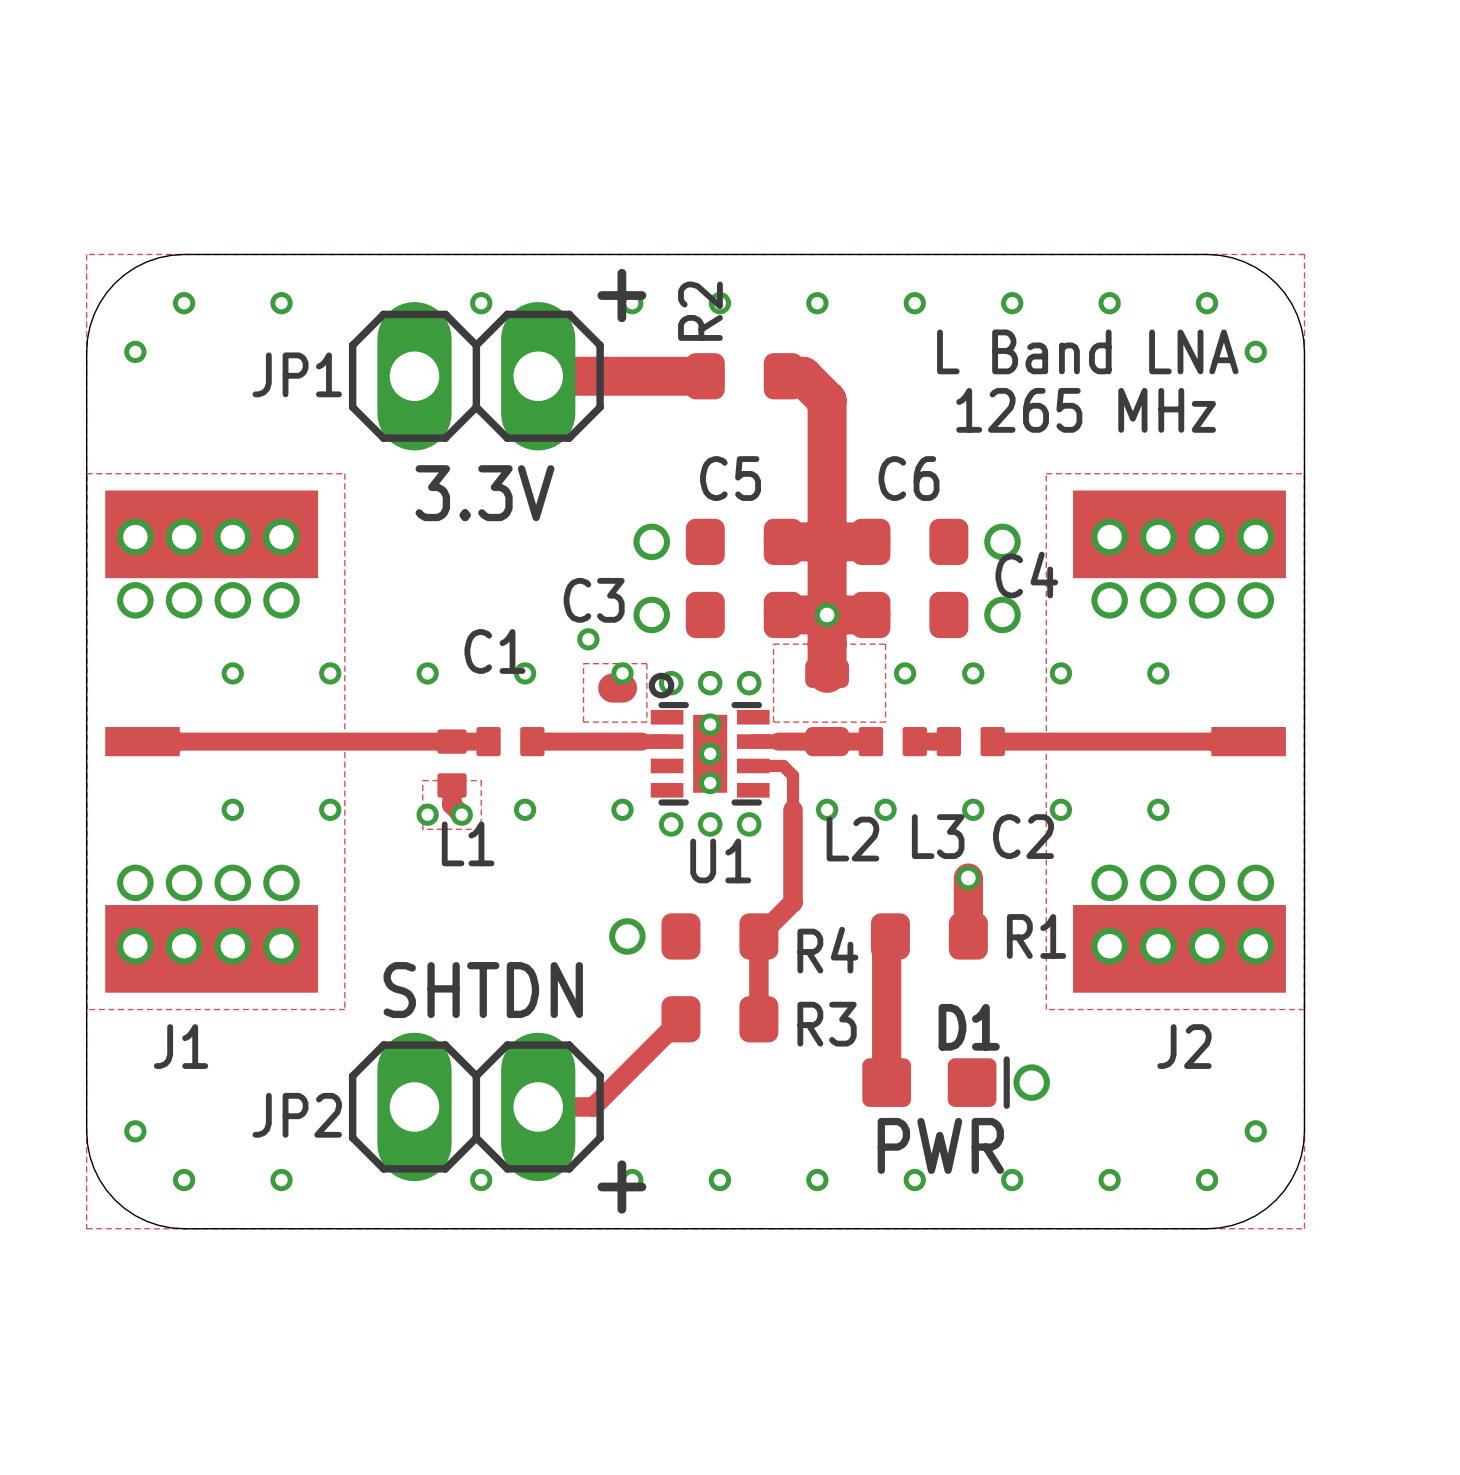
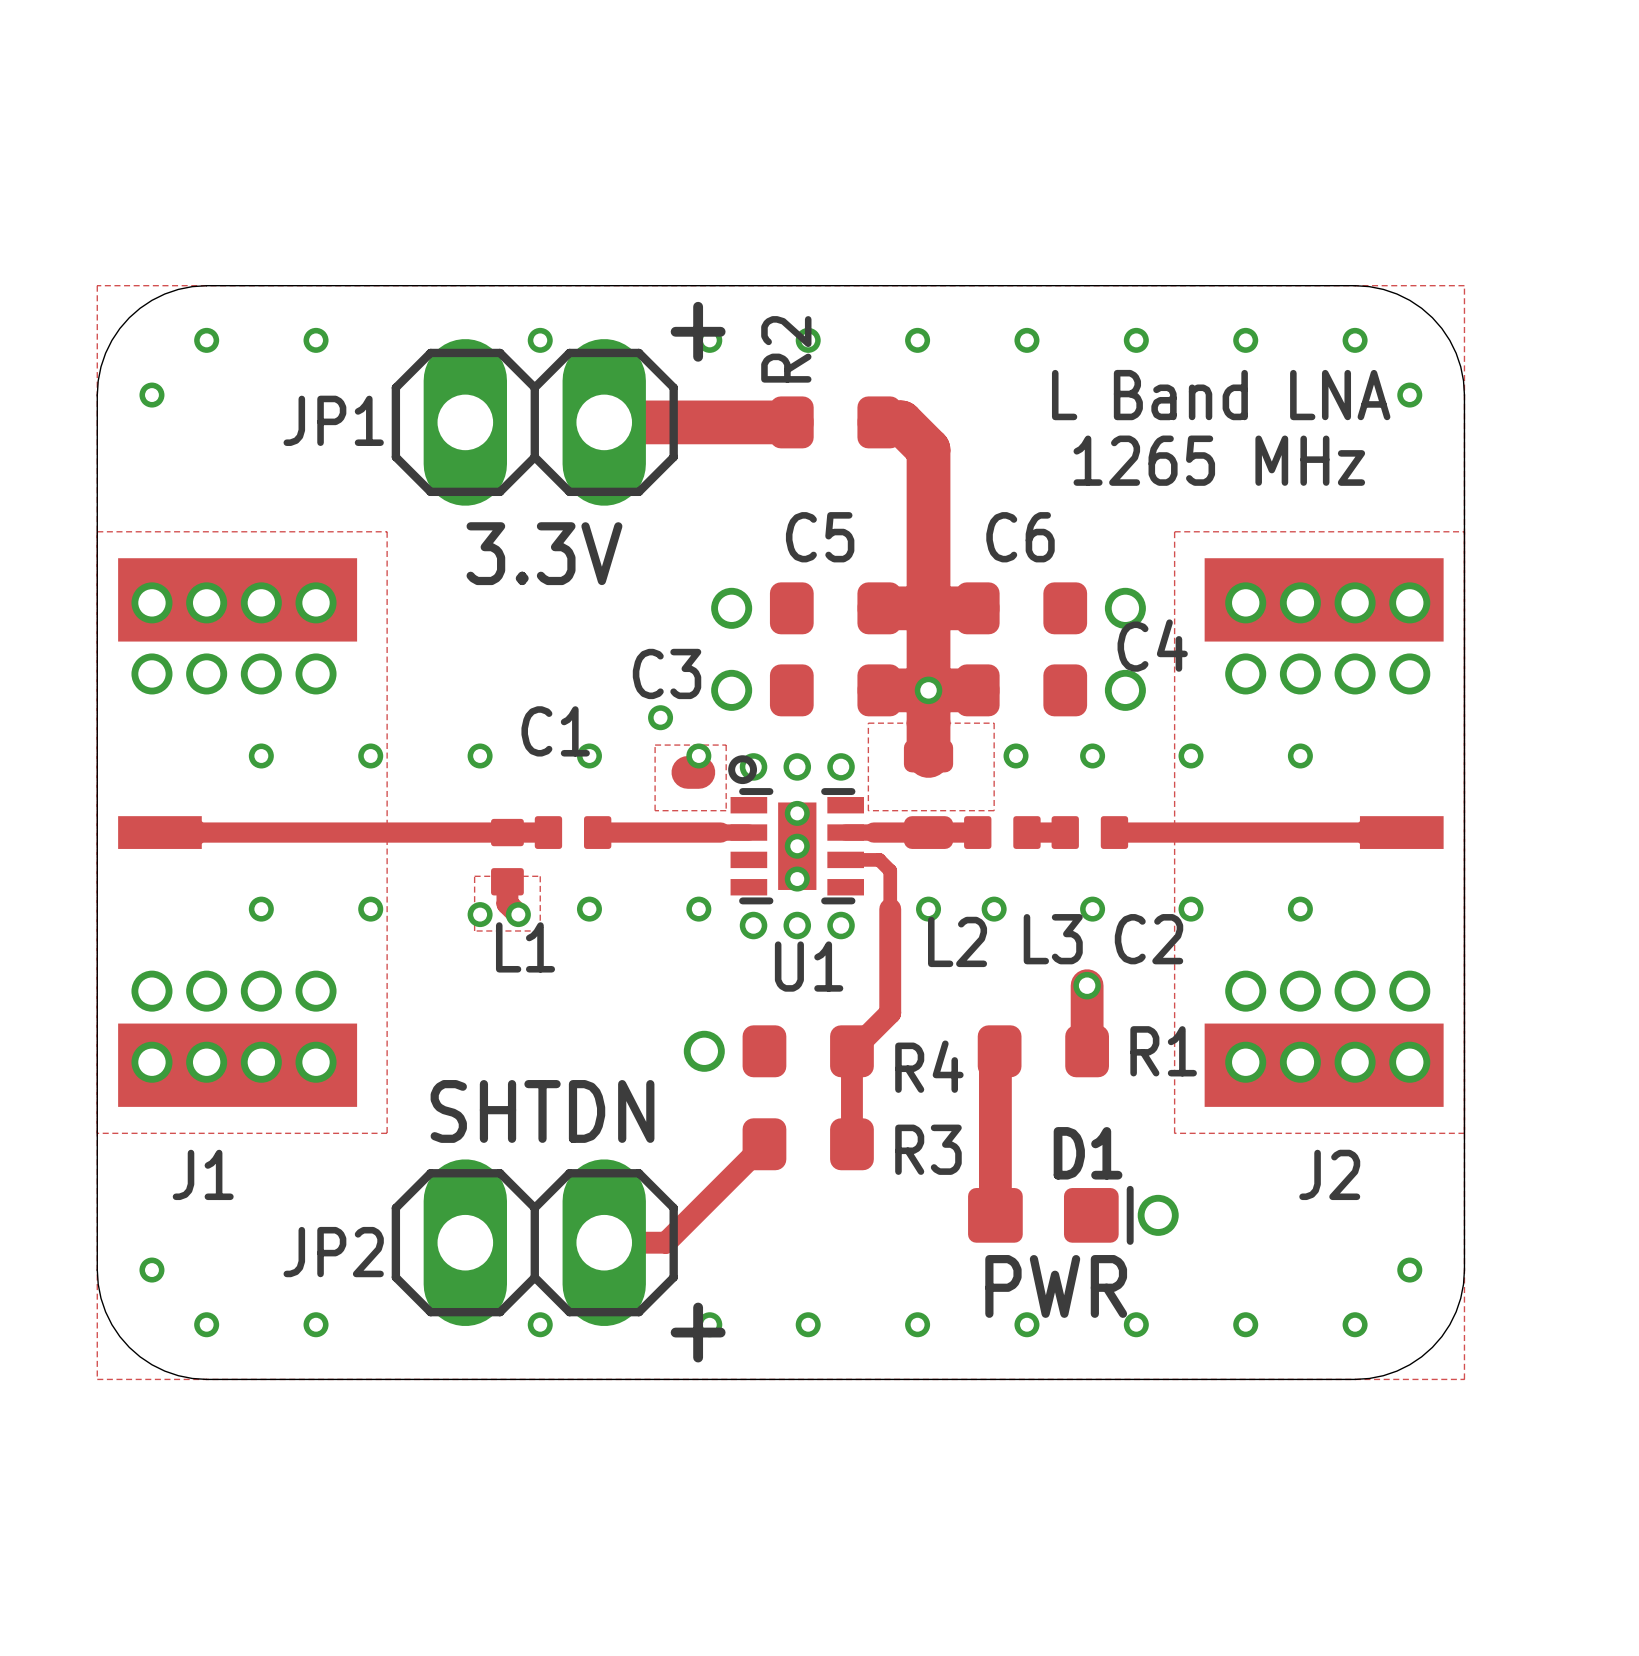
J1 footprint: [105, 490, 319, 993] -> [118, 558, 358, 1107]
J2 footprint: [1073, 490, 1286, 993] -> [1204, 558, 1444, 1107]

